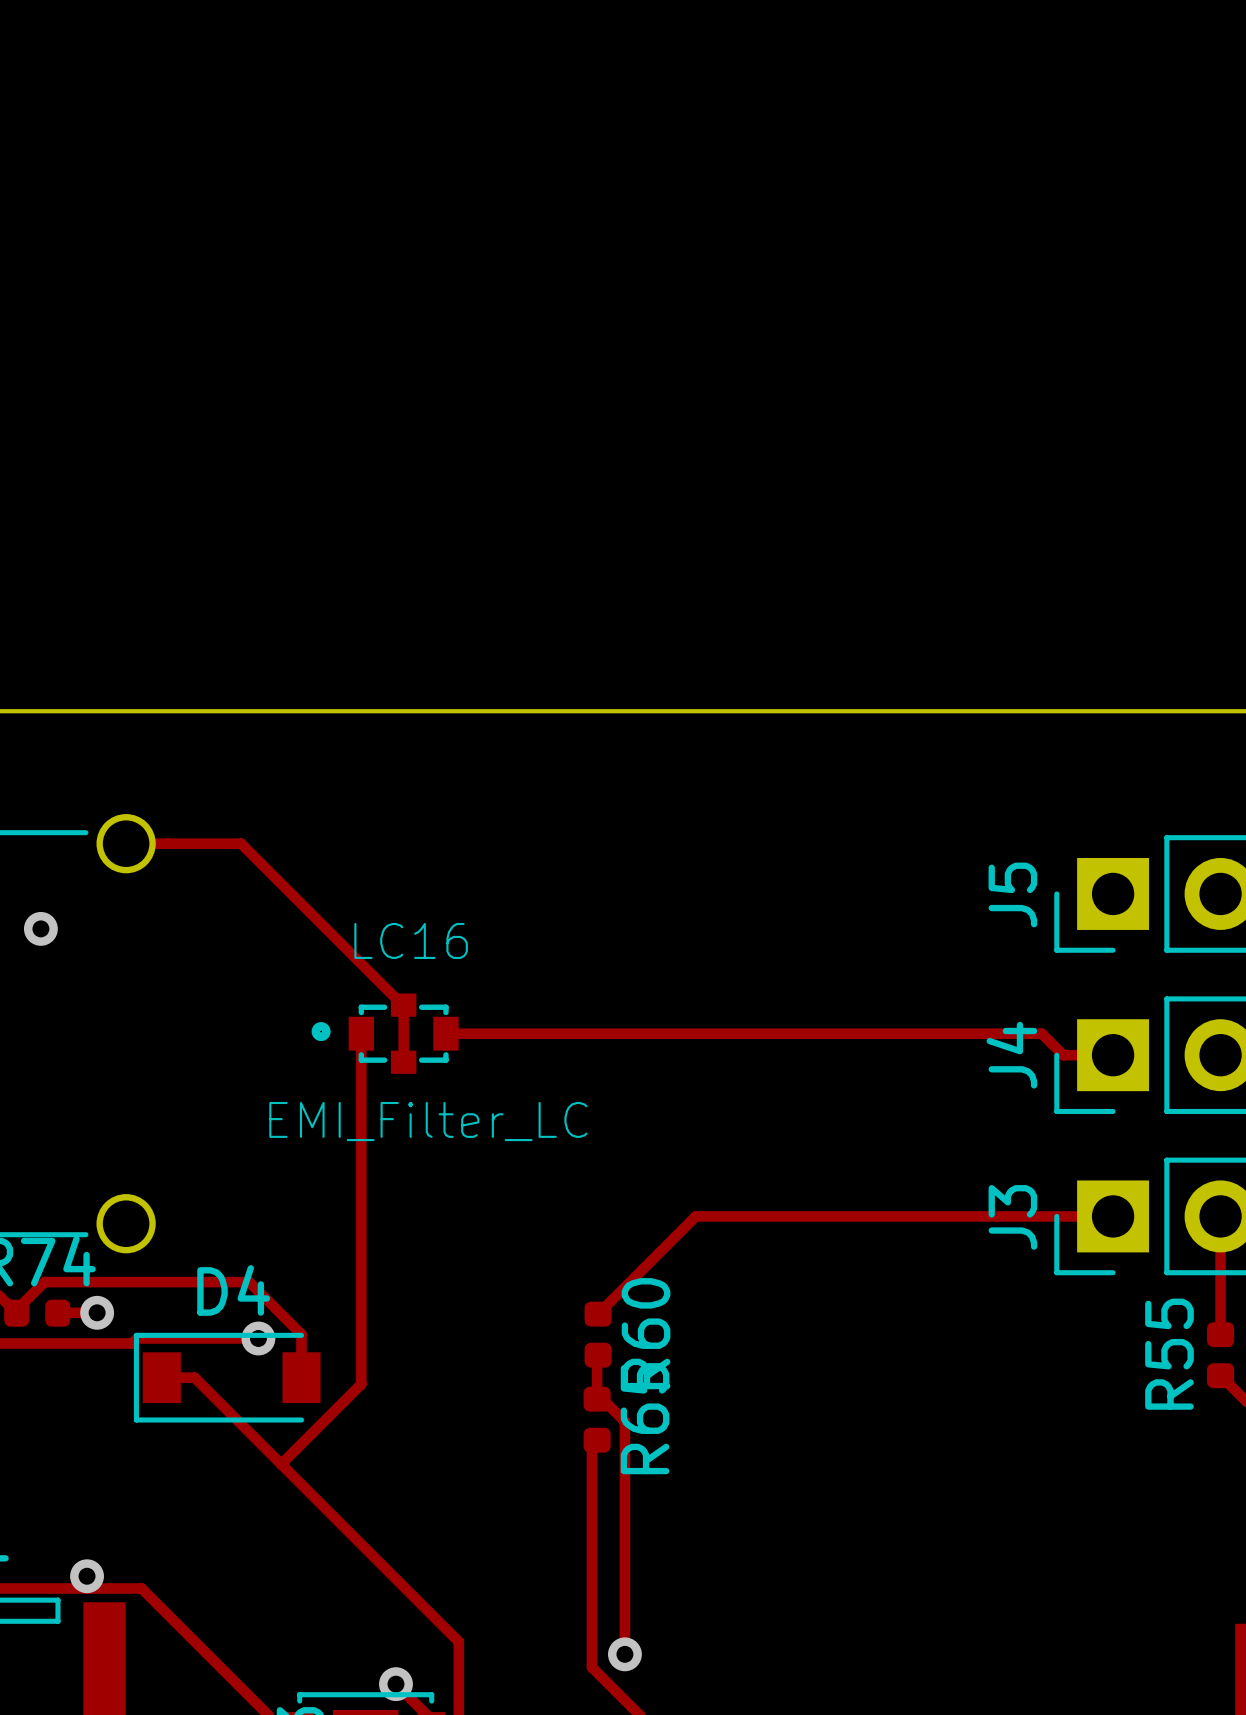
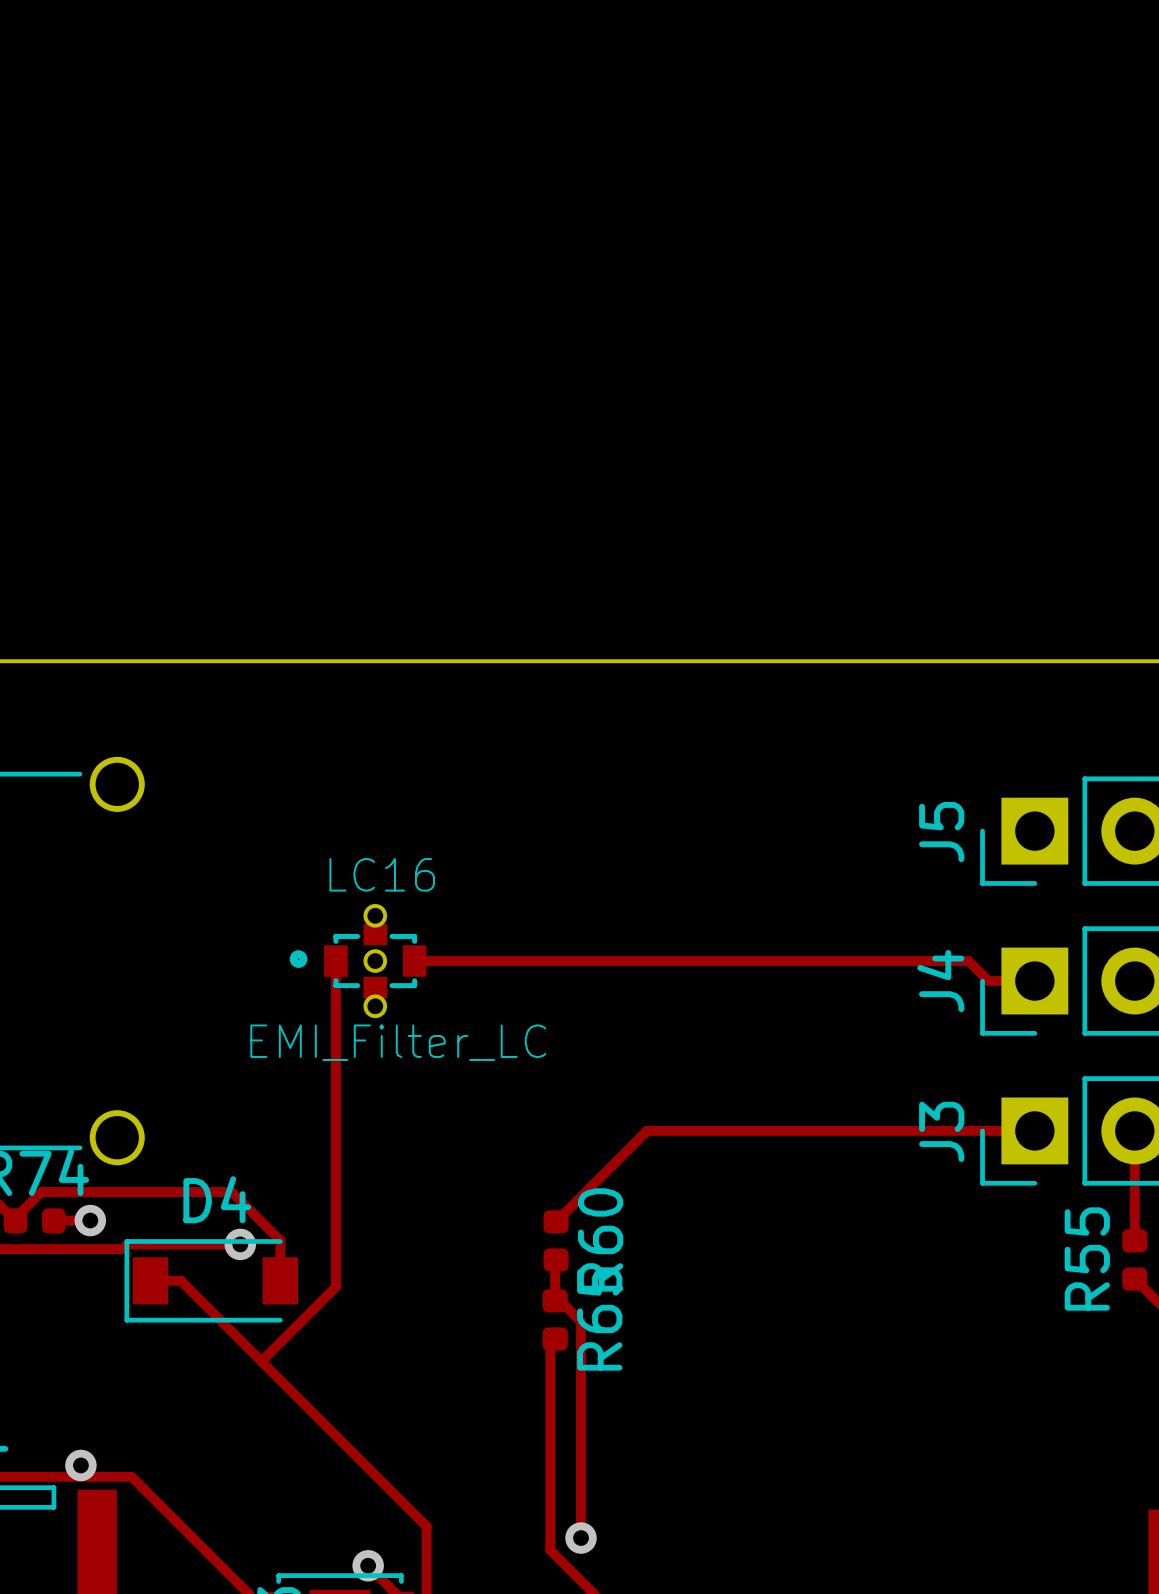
track: (126, 843) (241, 843) (403, 1005) (403, 1062) -> none
via: (40, 928) -> none
LC16 footprint: [311, 993, 459, 1074] -> [289, 903, 427, 1019]

